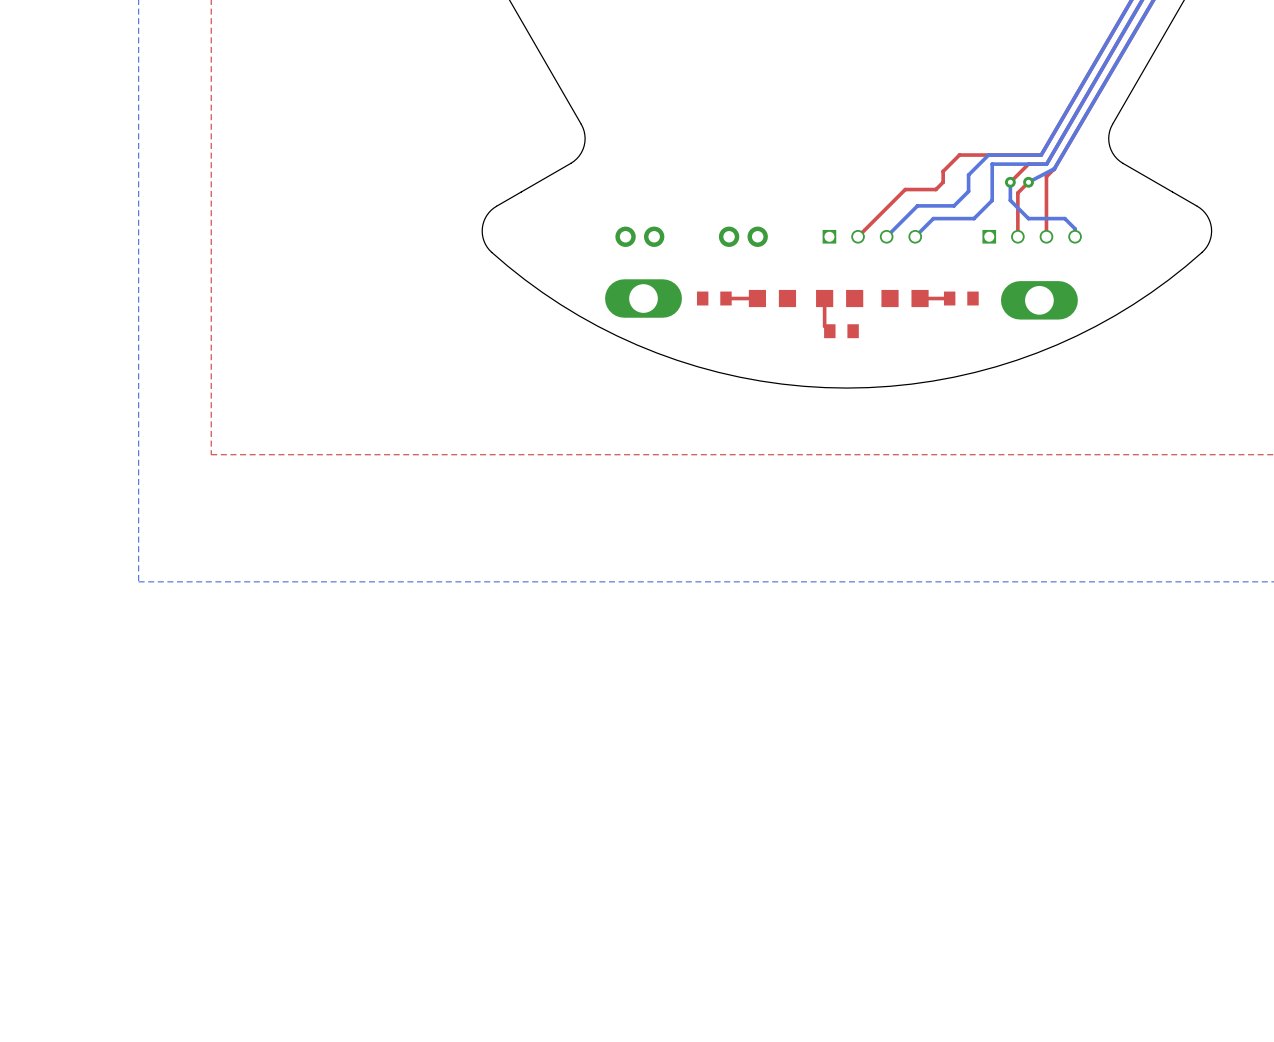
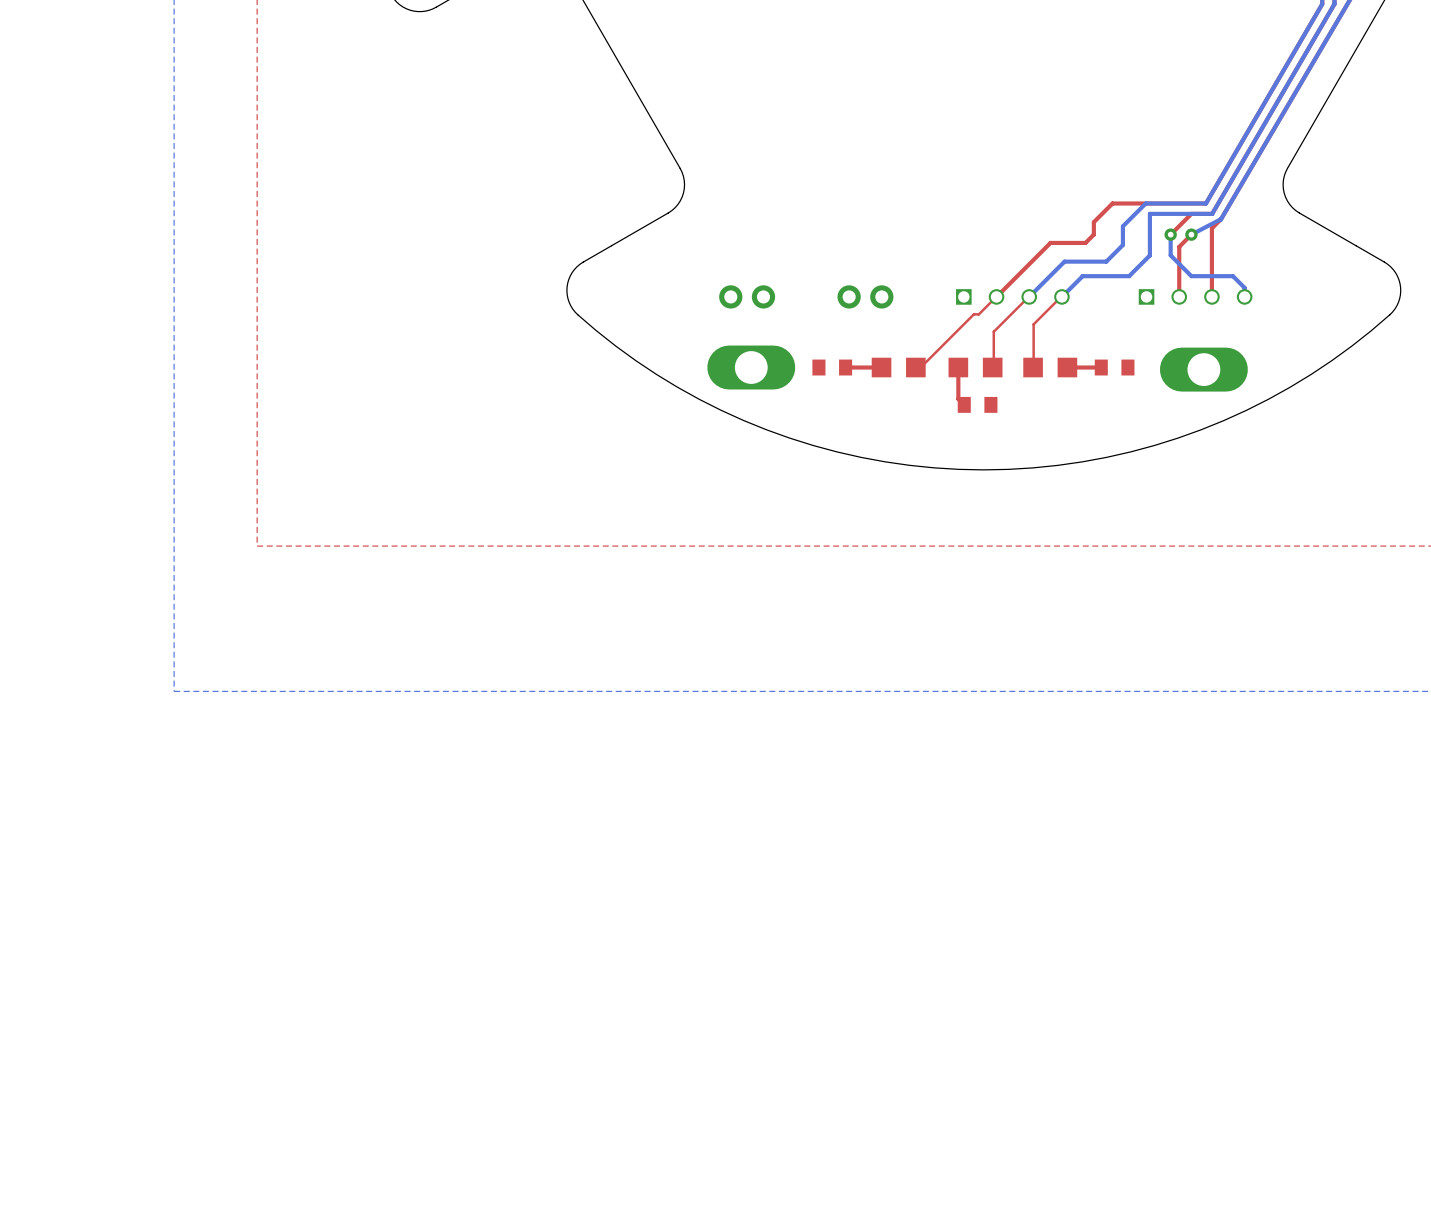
top track: none -> (996, 296) (978, 314) (973, 314) (921, 366) (915, 367)
top track: none -> (1029, 296) (993, 331) (992, 367)
top track: none -> (1061, 296) (1033, 324) (1033, 367)

